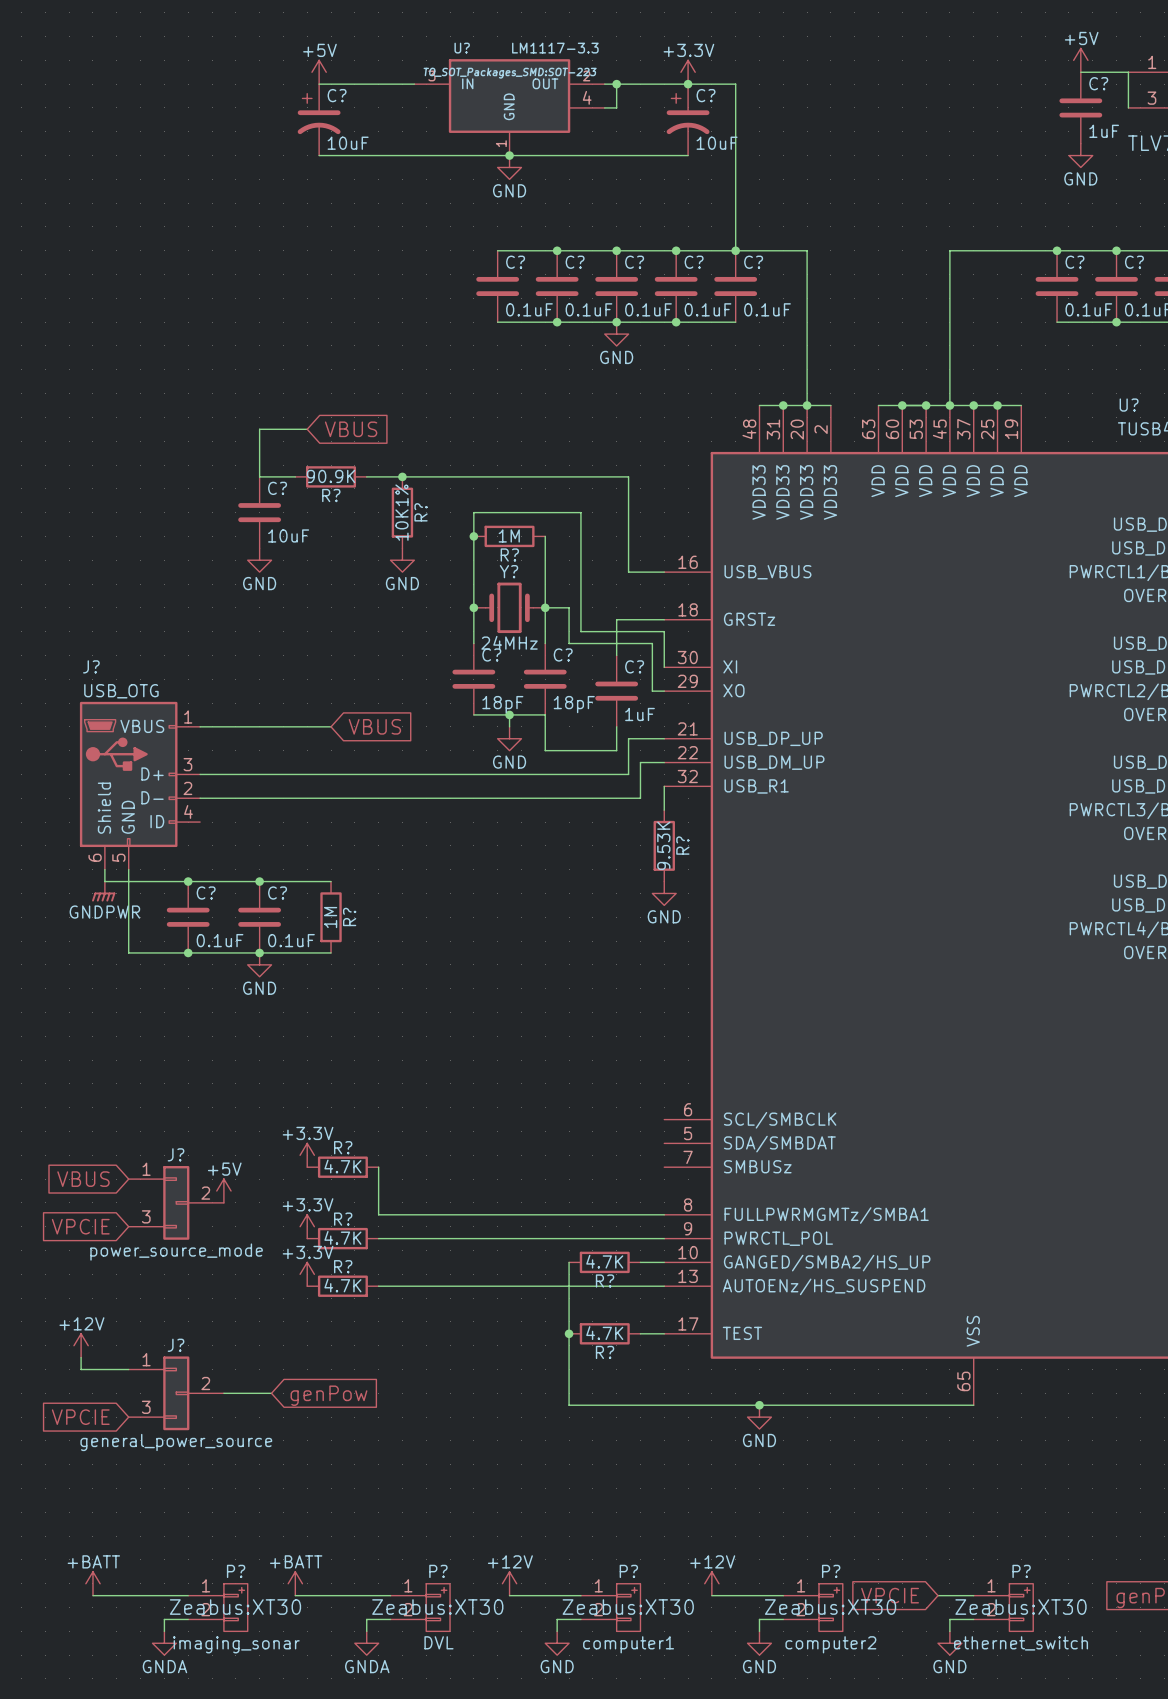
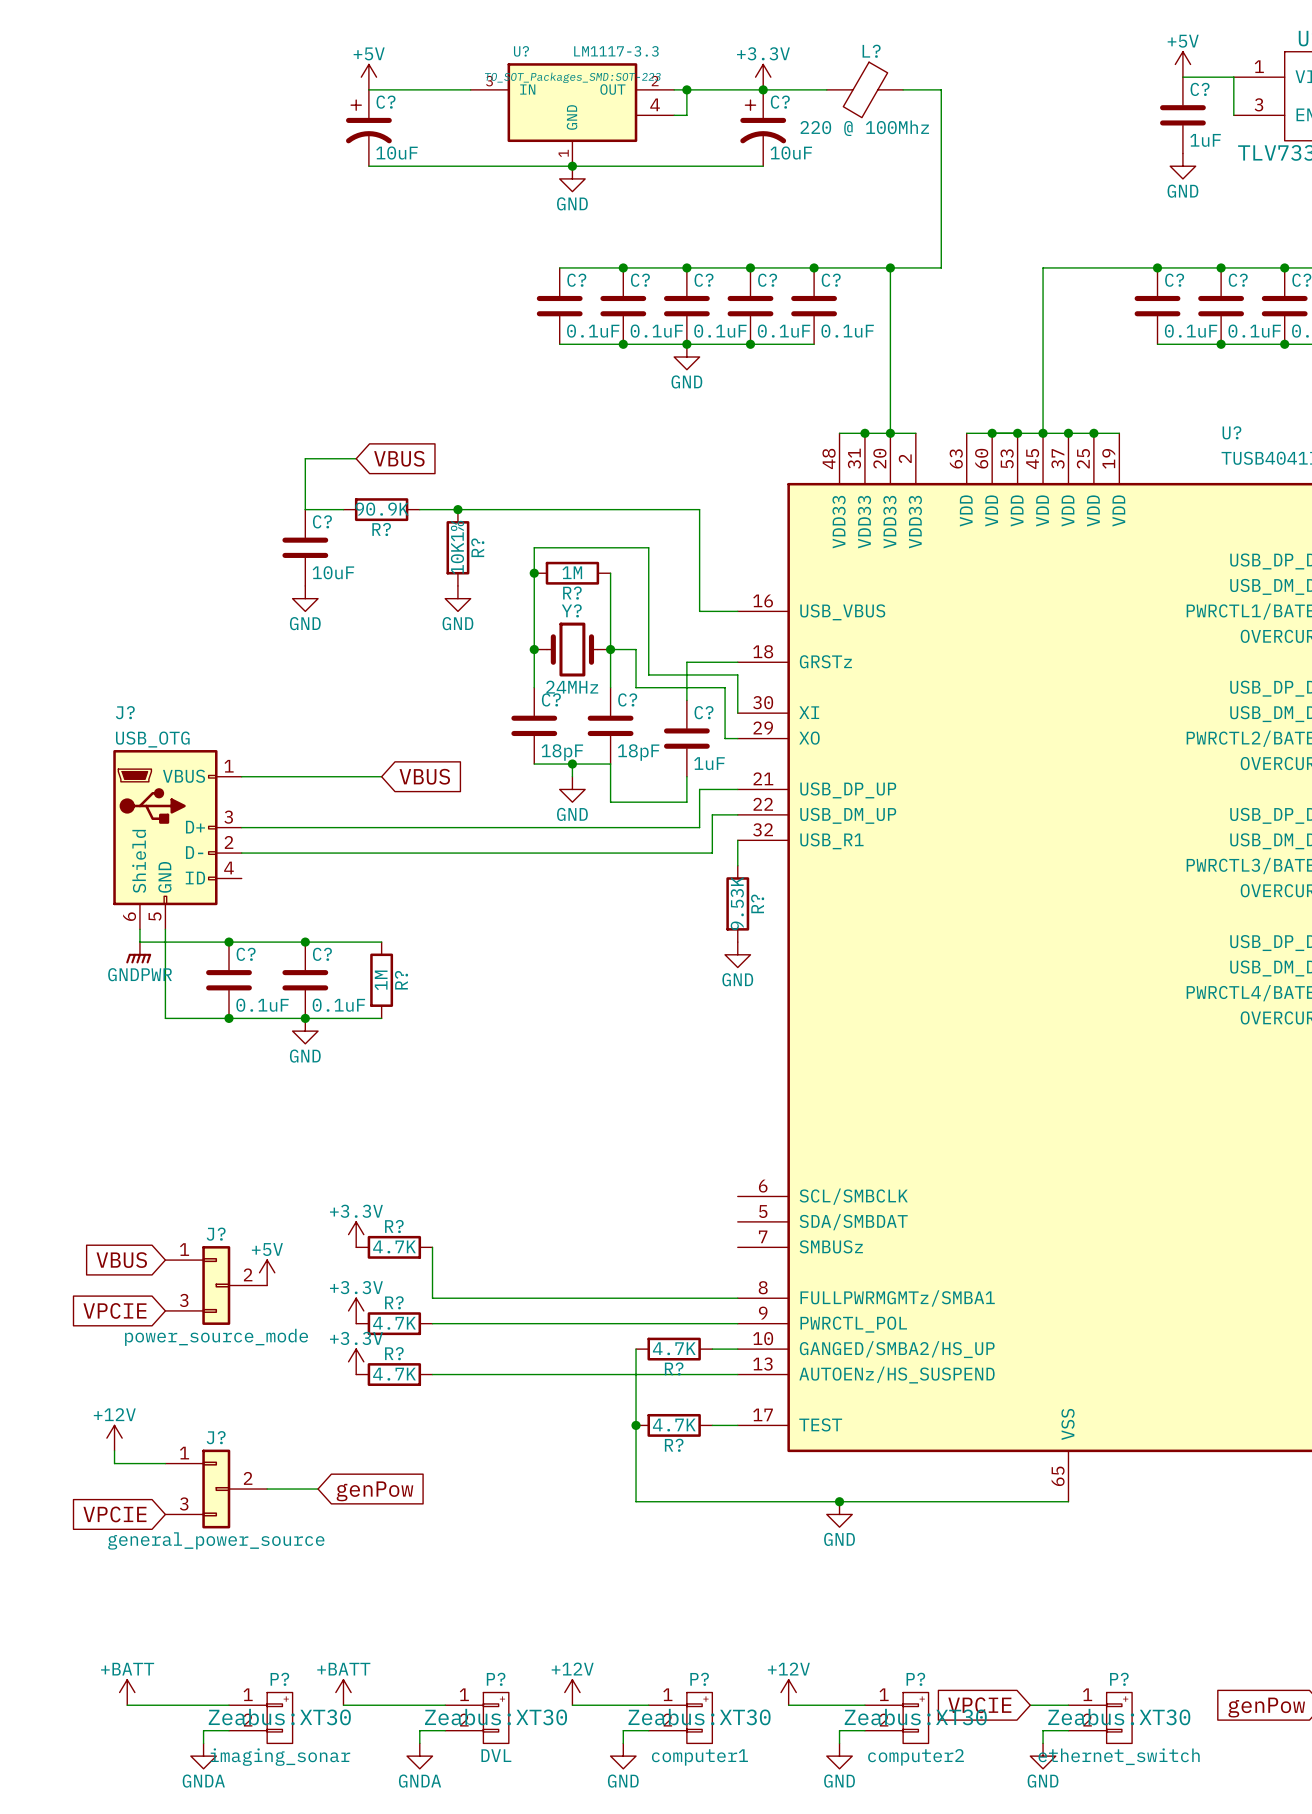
wire: (735, 84) (735, 250) -> (814, 89) (826, 89)
L?: none -> 220 @ 100Mhz (864, 89)
wire: none -> (903, 89) (941, 89) (941, 267) (890, 267)
junction: none -> (890, 267)

